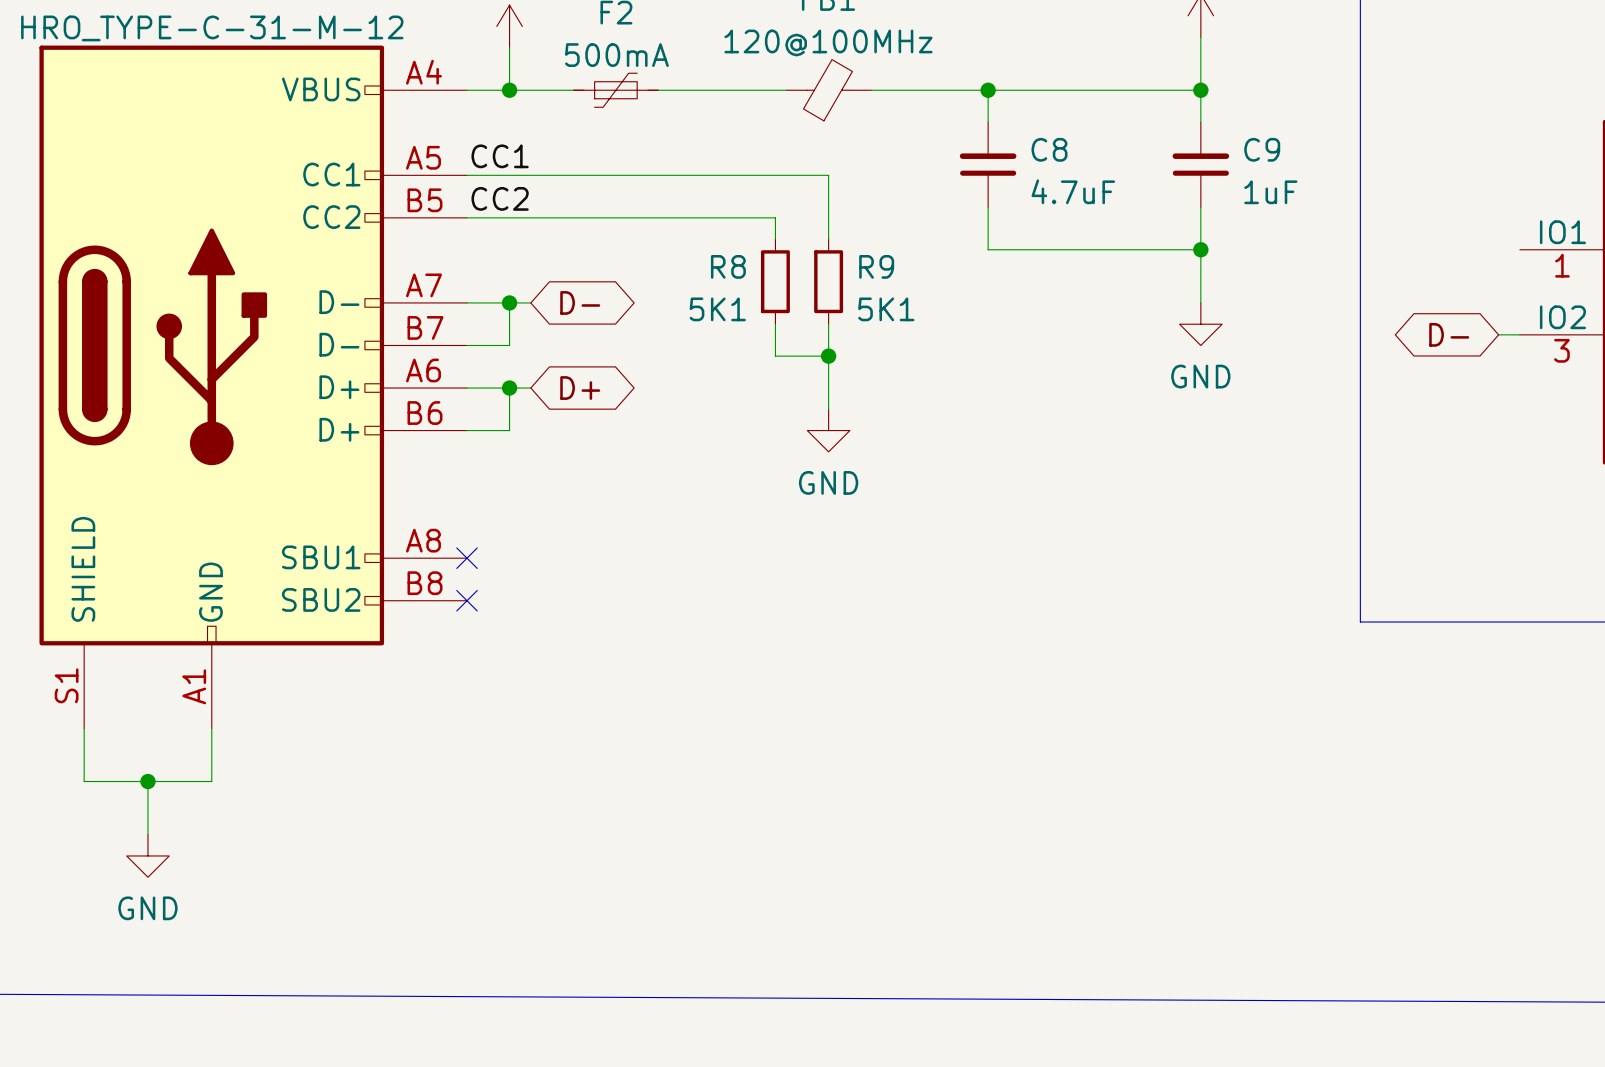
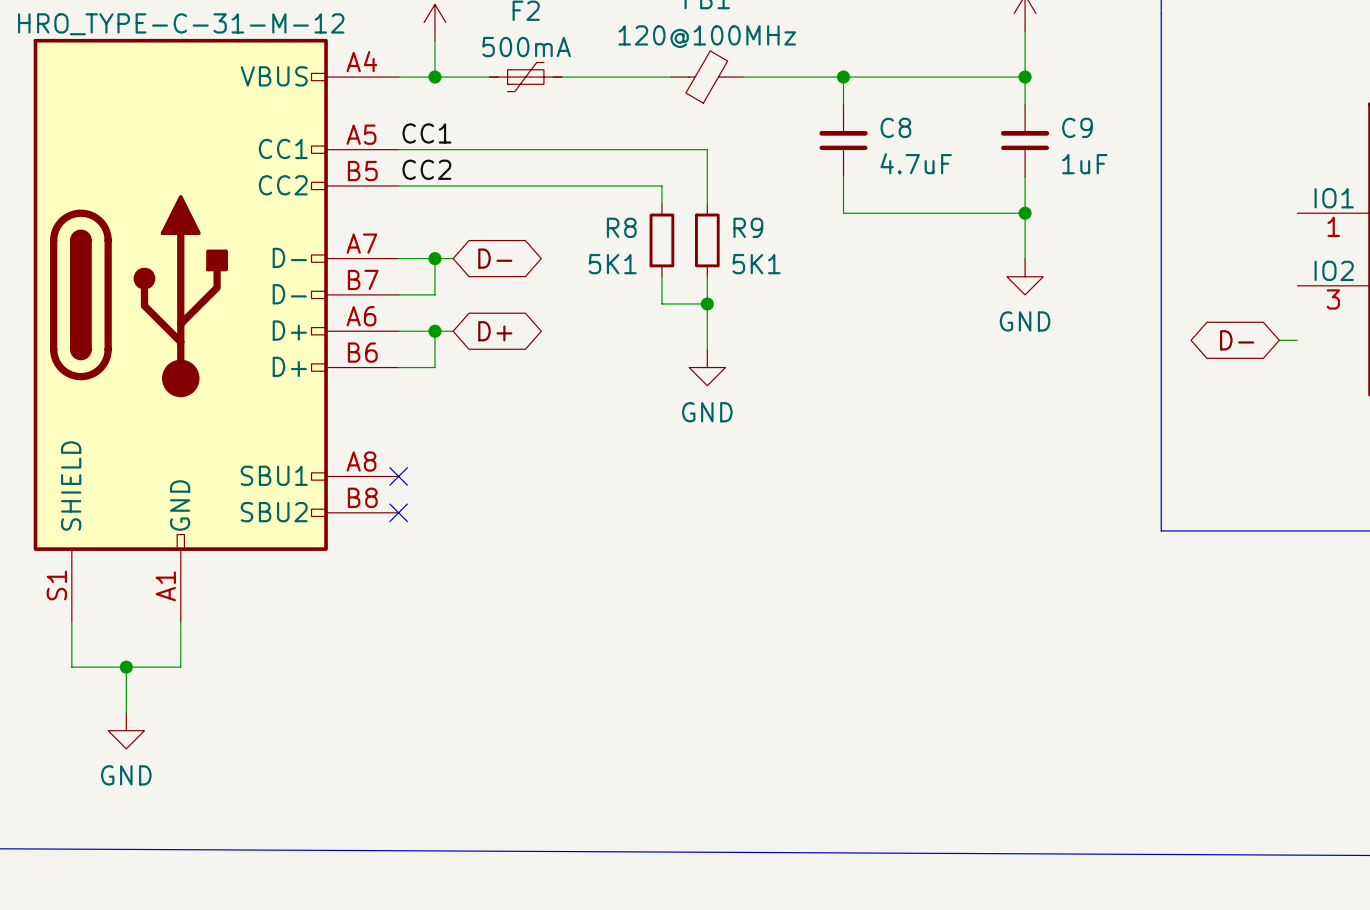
global label position: D- (1449, 334) -> D- (1237, 340)
wire: (1498, 334) (1519, 334) -> (1279, 340) (1297, 340)

